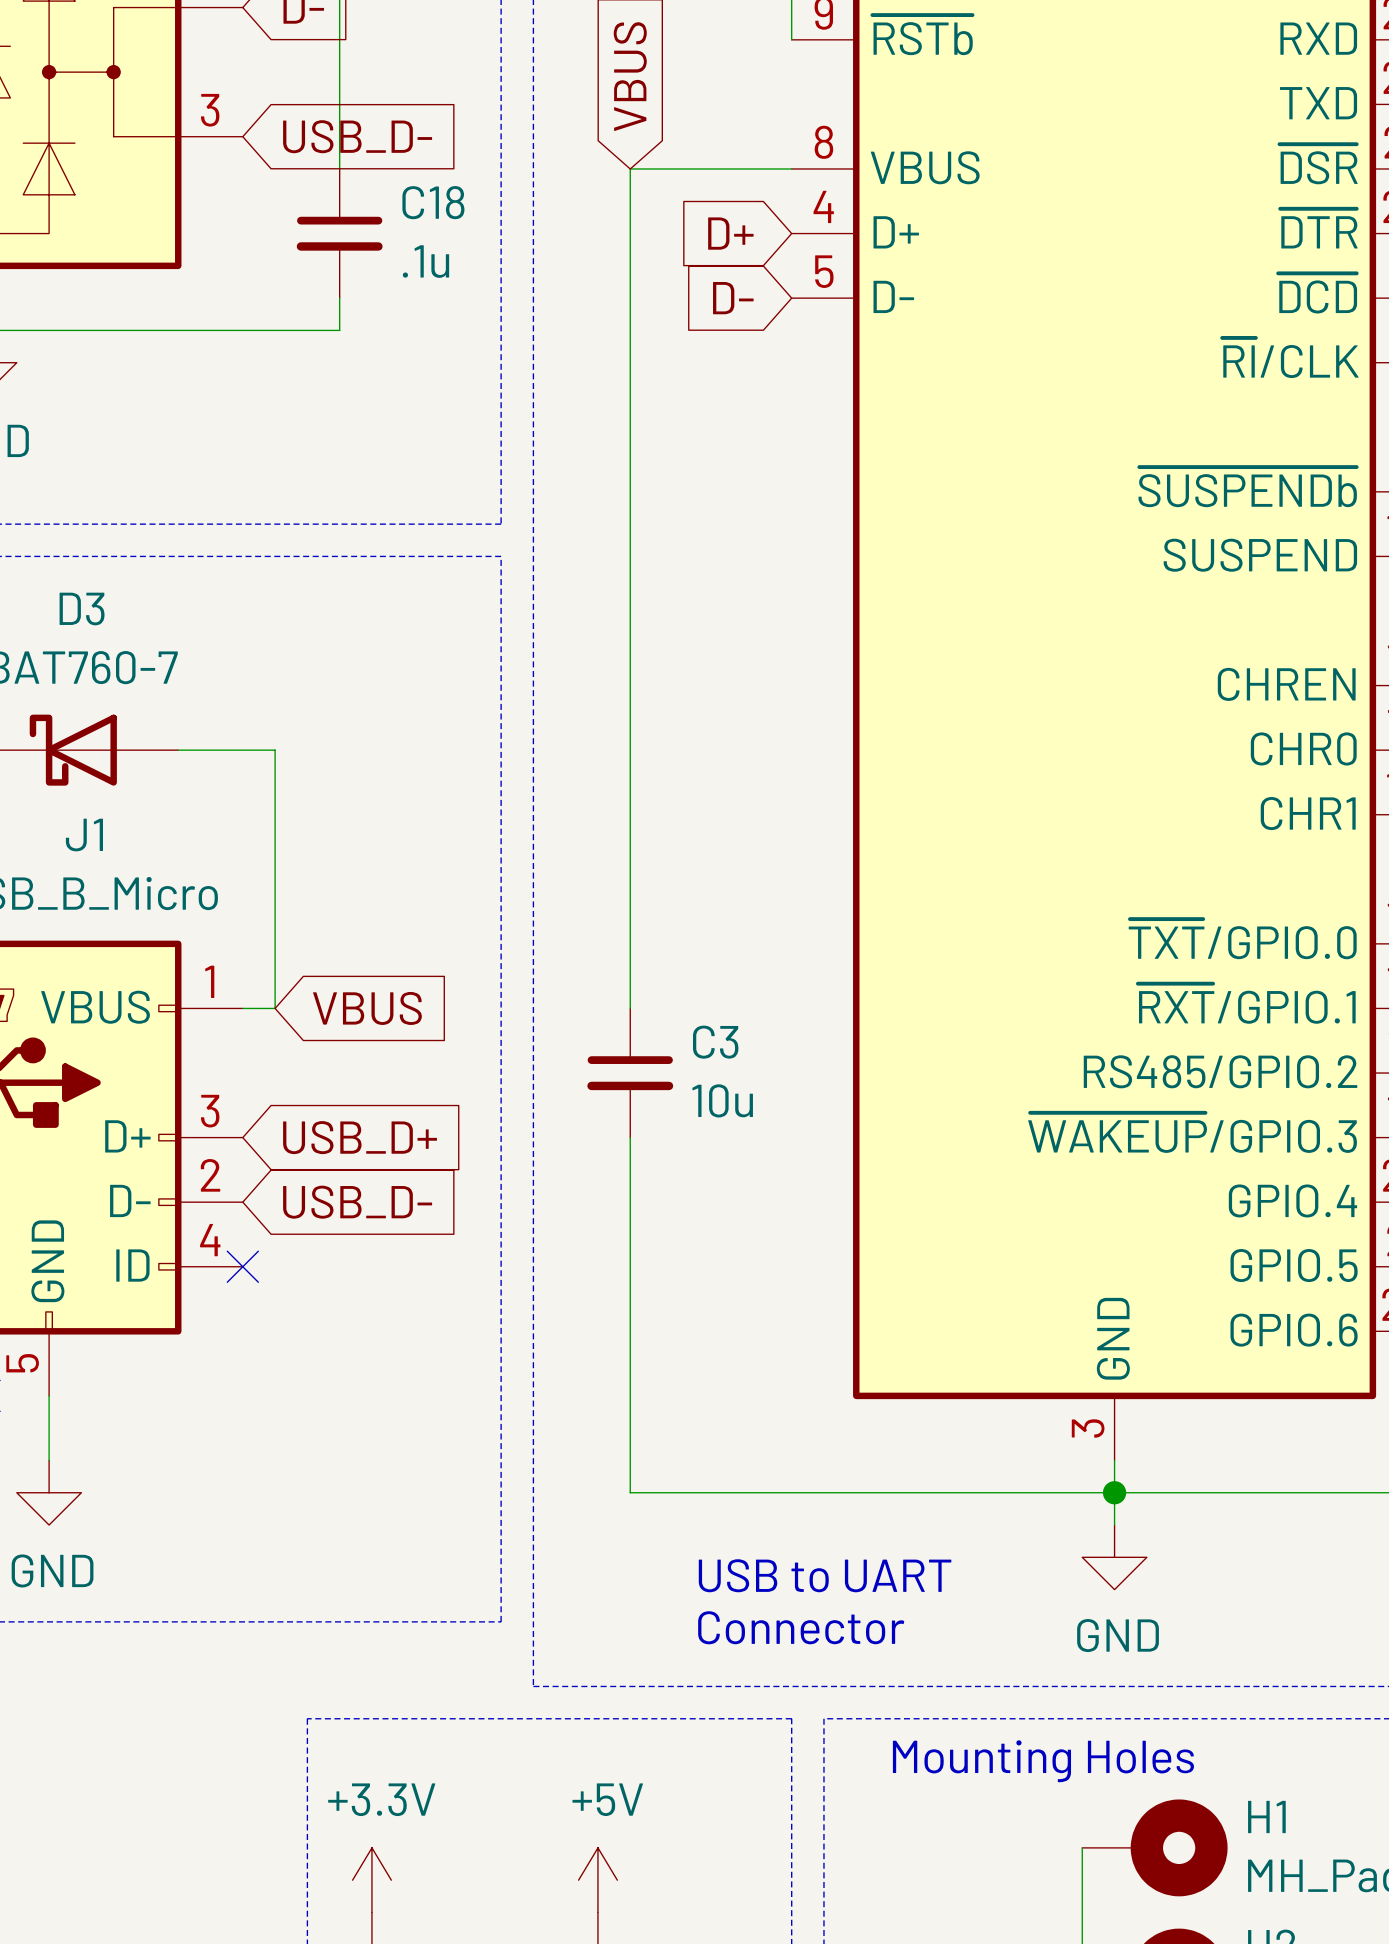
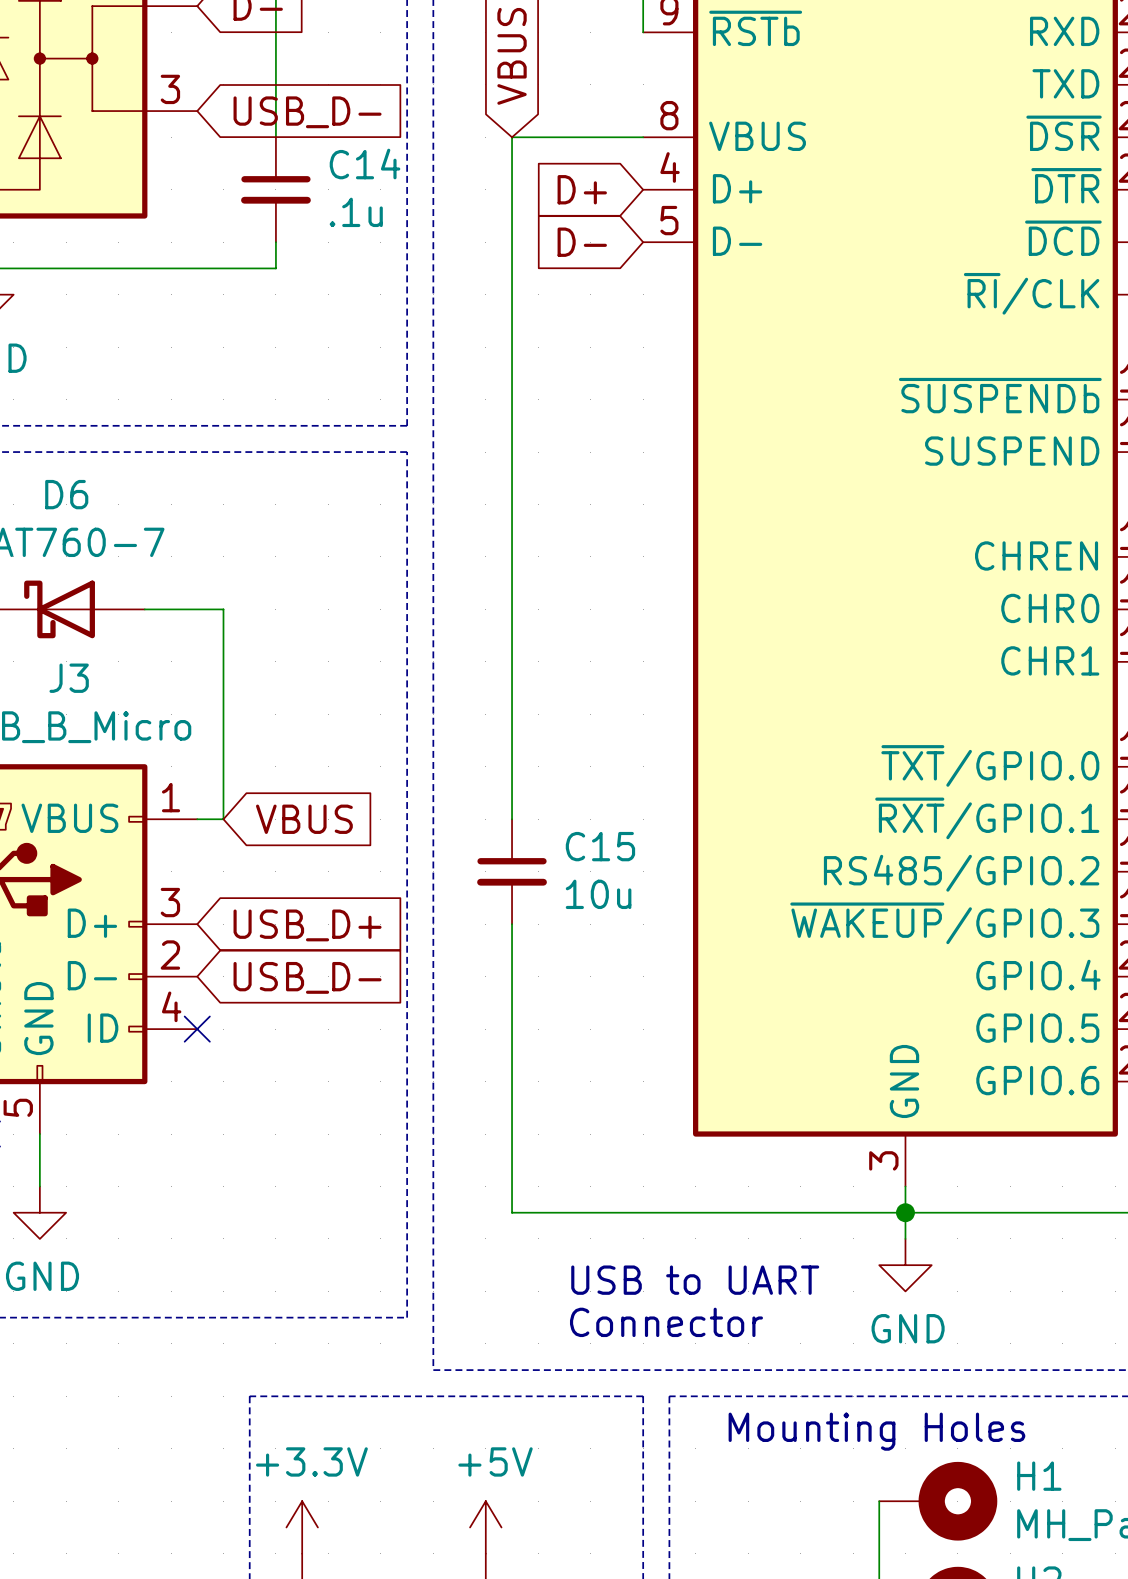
C18 name: C18 (433, 202) -> C14 (365, 164)
D3 name: D3 (82, 609) -> D6 (66, 494)
J1 name: J1 (84, 835) -> J3 (69, 678)
C3 name: C3 (715, 1042) -> C15 (600, 846)

